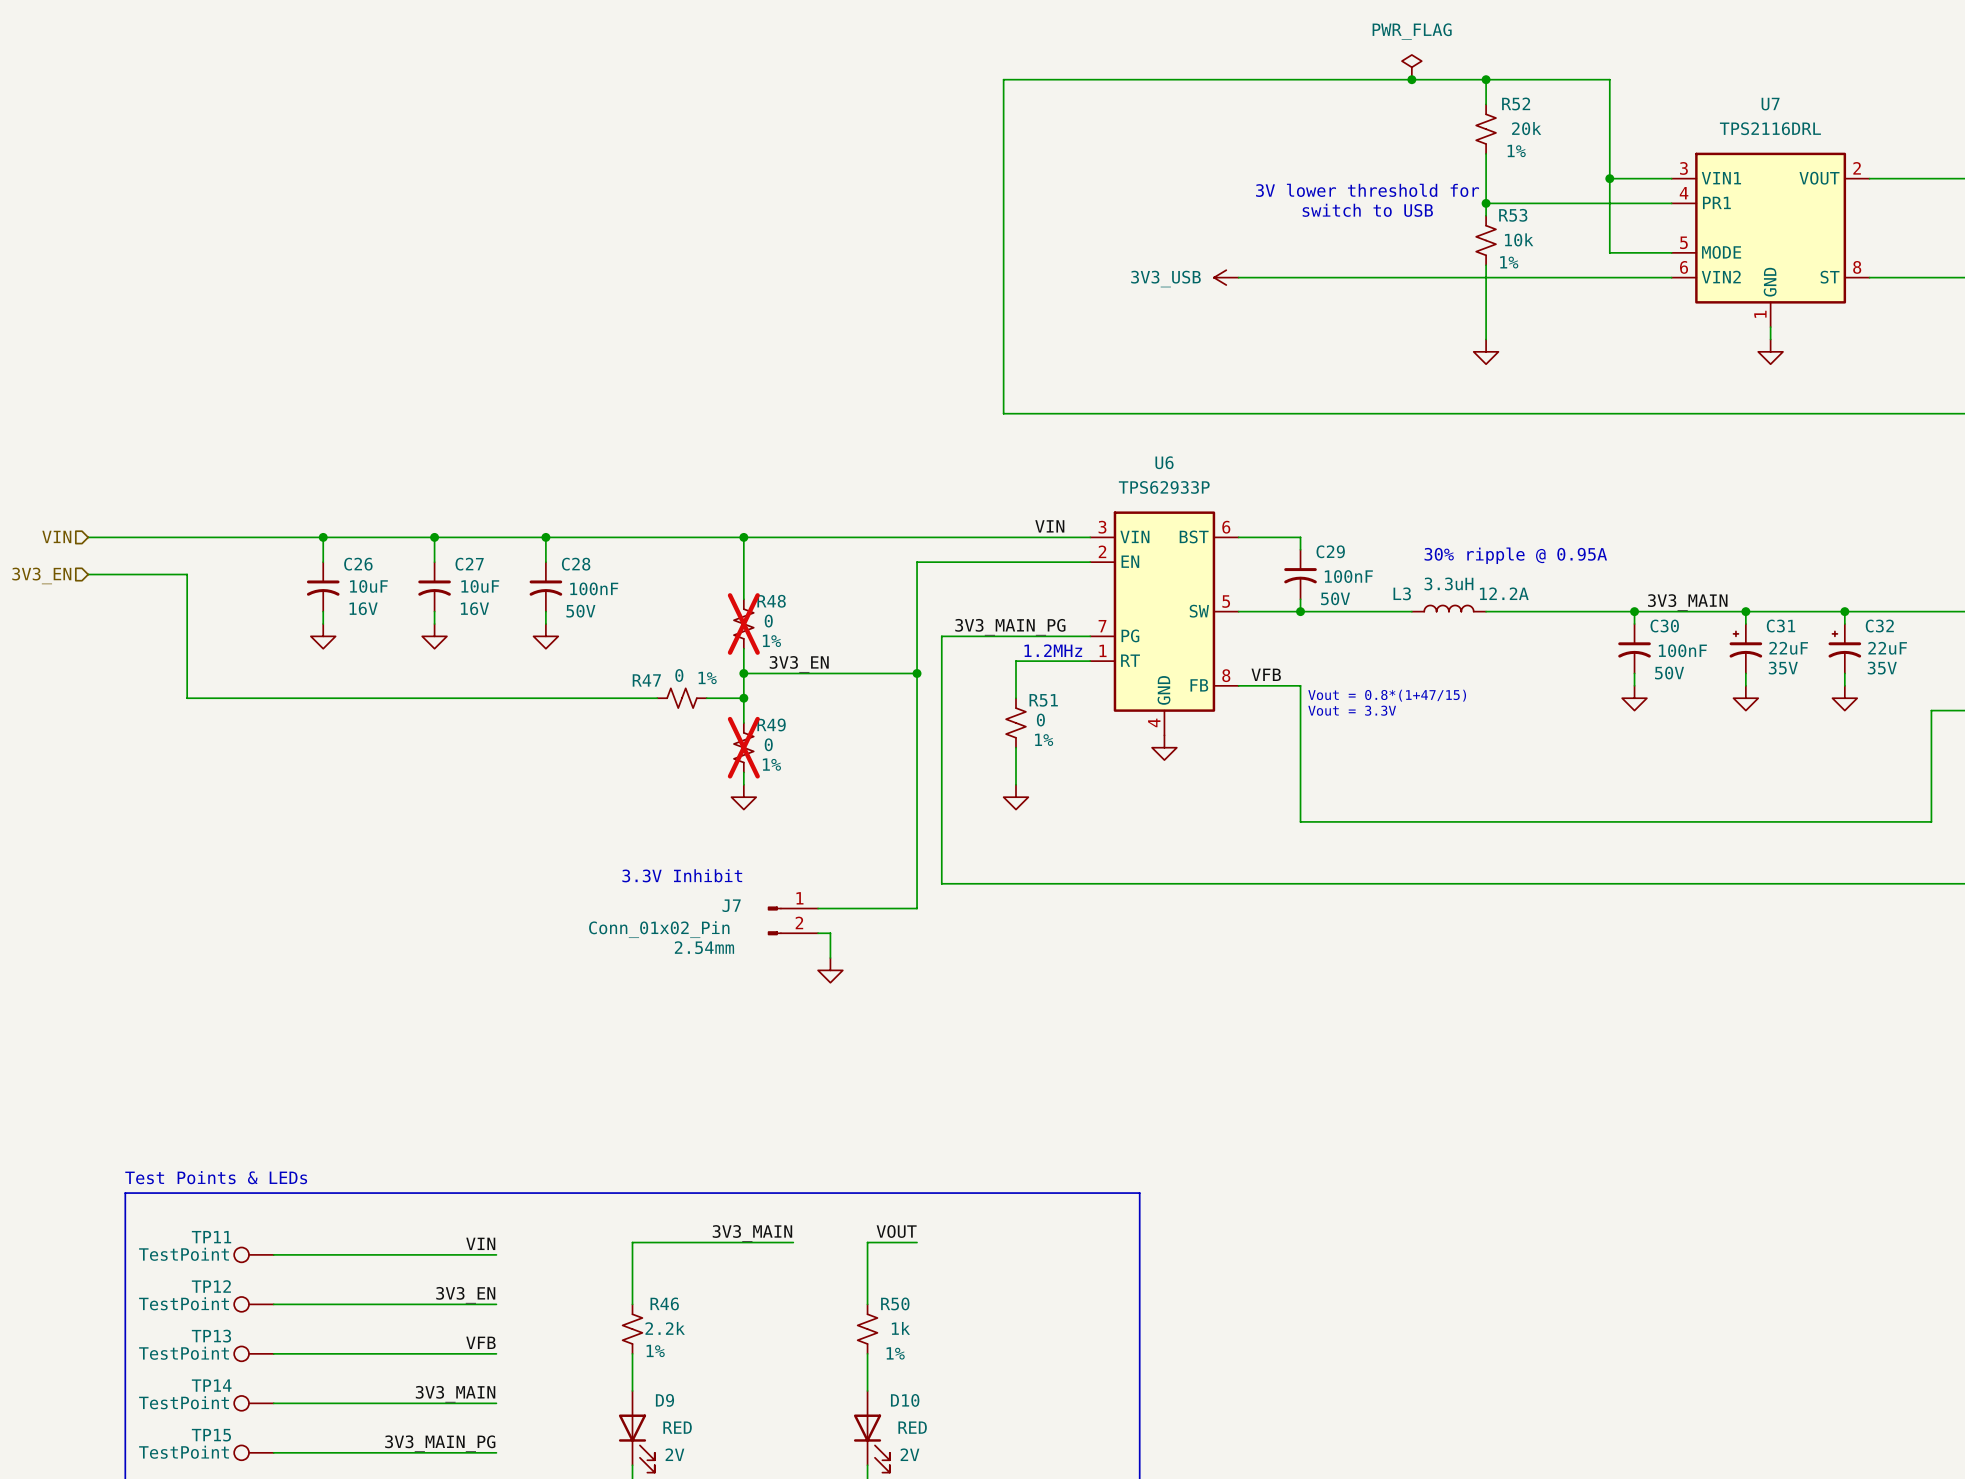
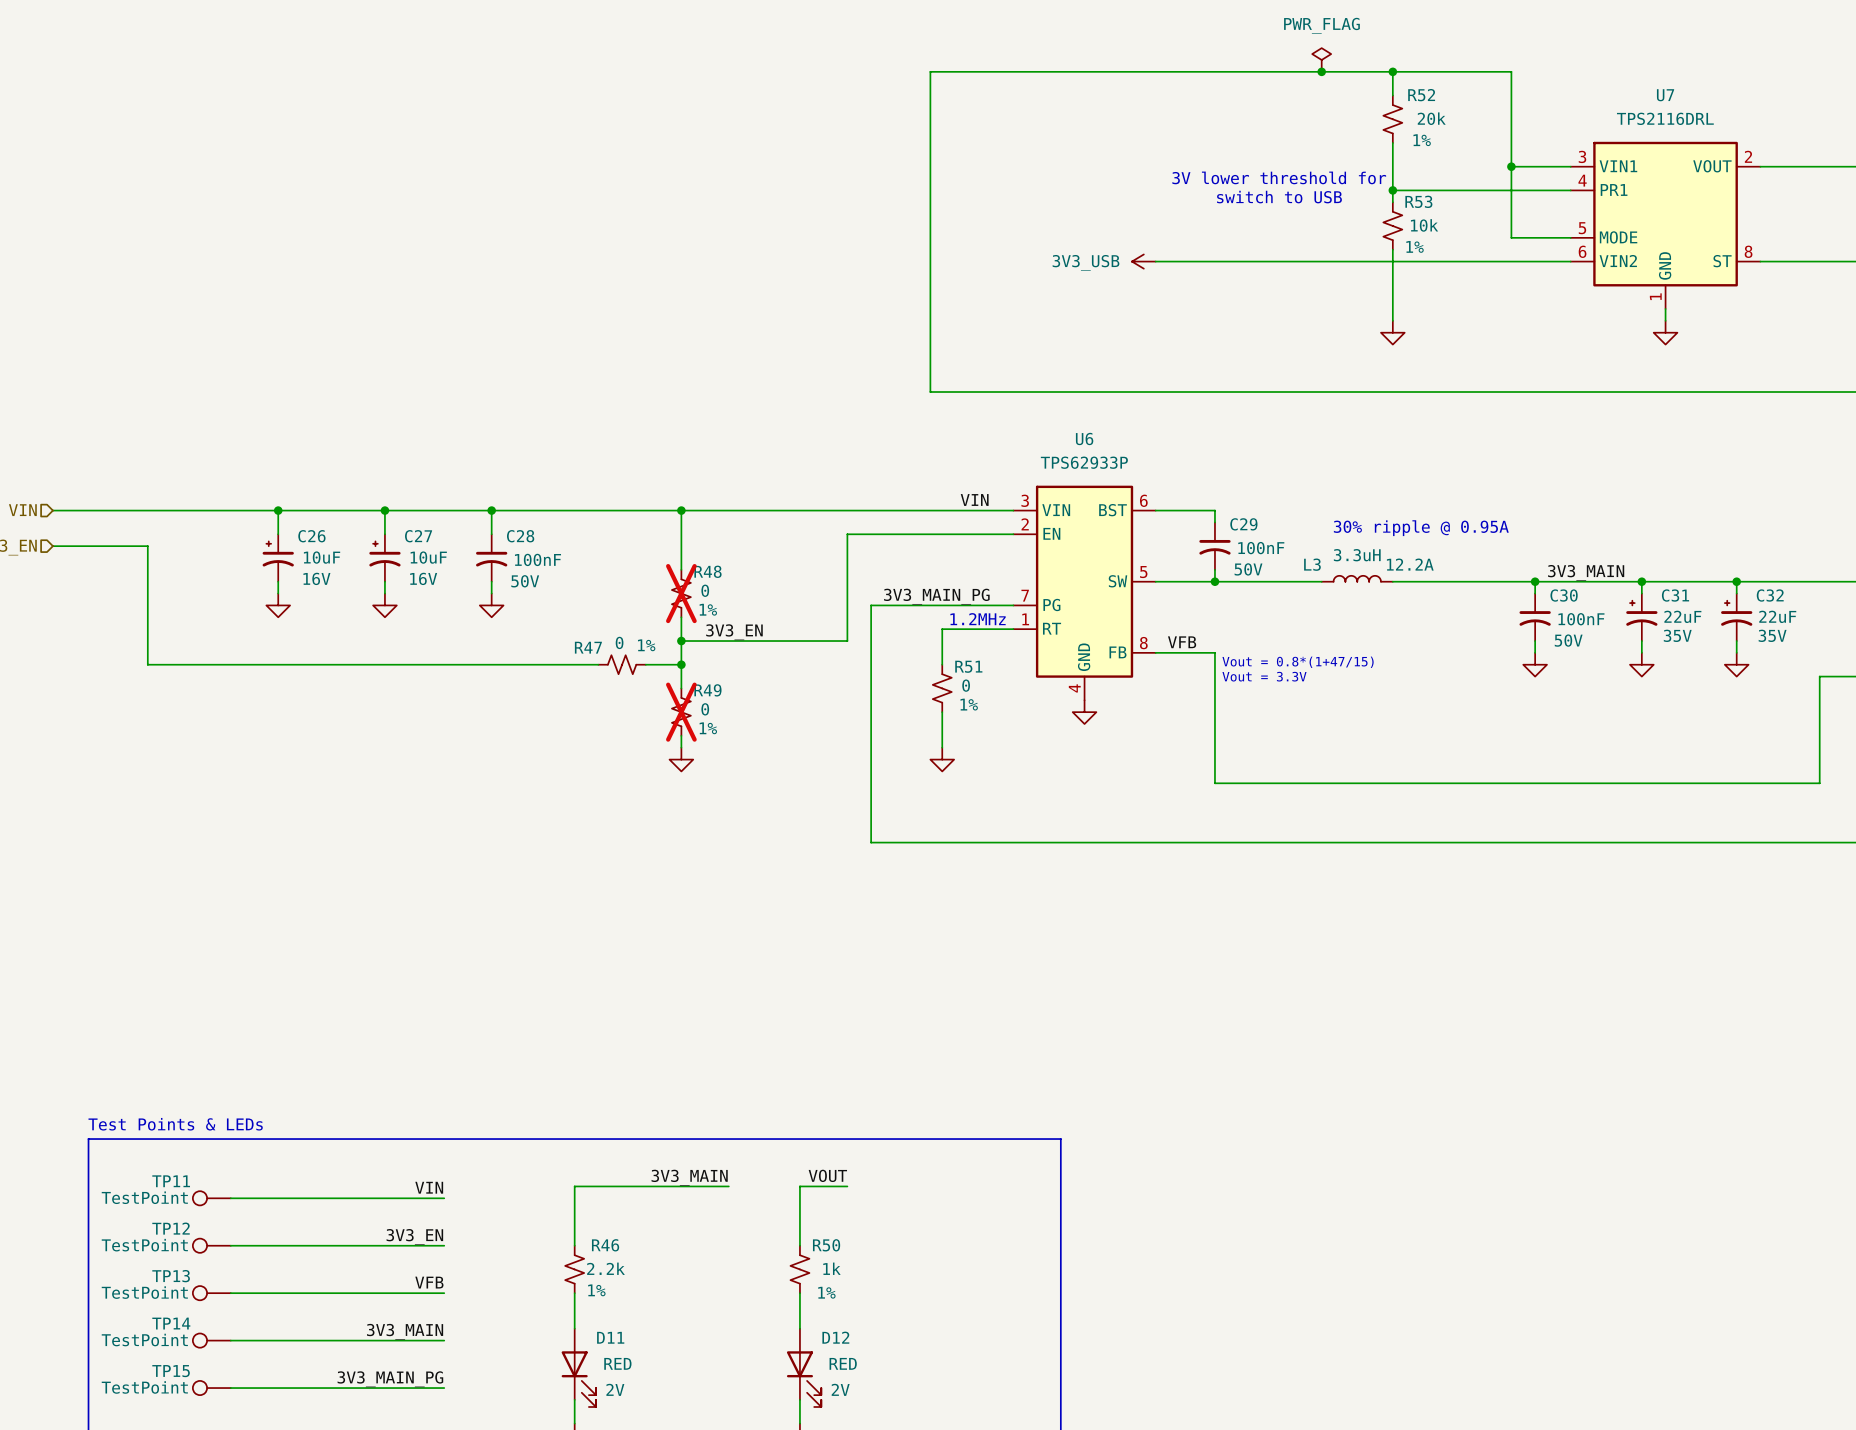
C26 symbol: [306, 562, 340, 612] -> [262, 534, 294, 582]
C27 symbol: [418, 562, 451, 612] -> [369, 534, 401, 582]
wire: (917, 673) (917, 908) (818, 908) -> none
junction: (917, 673) -> none
text: 3.3V Inhibit (682, 875) -> none
J7: Conn_01x02_Pin (792, 920) -> none
wire: (818, 933) (830, 933) (830, 958) -> none
power symbol: (830, 970) -> none
D9 name: D9 (664, 1400) -> D11 (610, 1337)
D10 name: D10 (905, 1400) -> D12 (835, 1337)

